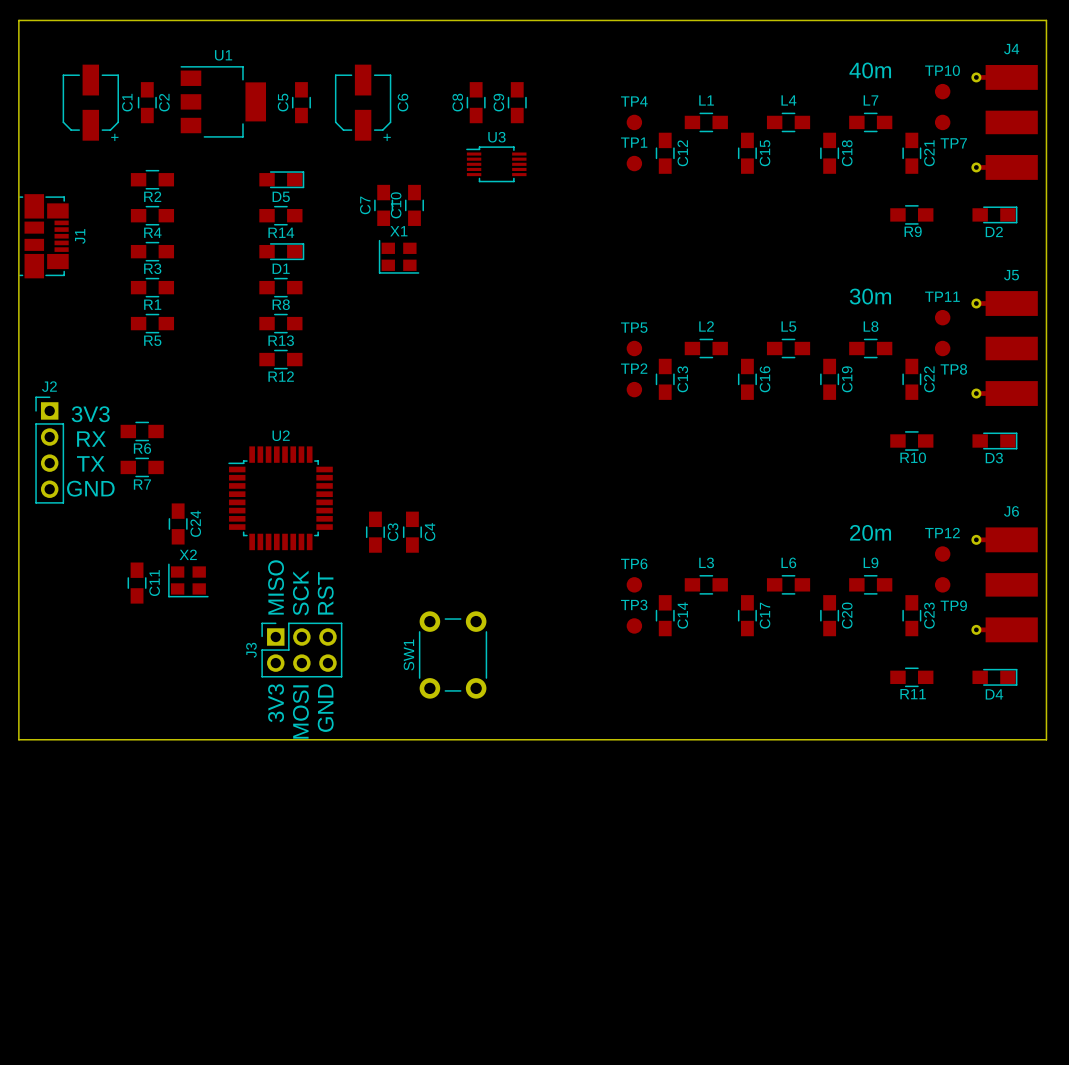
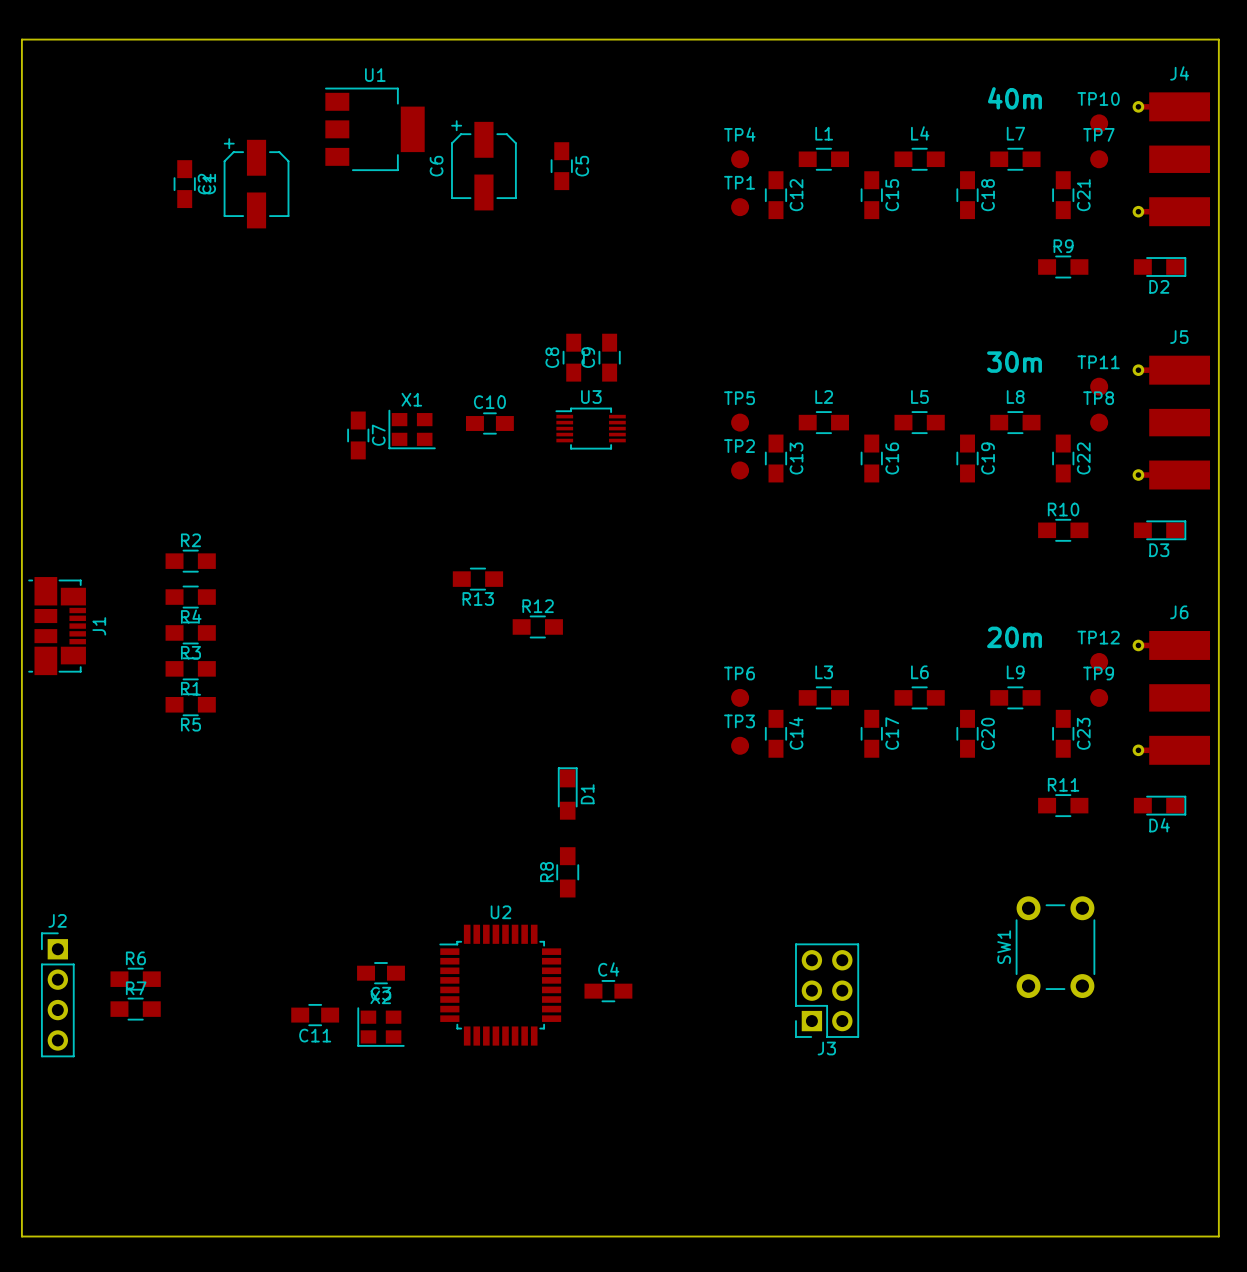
board edge: (18, 20) (18, 739) (1046, 739) (1046, 20) (18, 20) -> (21, 39) (21, 1236) (1218, 1236) (1218, 39) (21, 39)
U1 position: (223, 101) -> (374, 129)
C1 rotation: 0° (90, 102) -> 180° (256, 184)
C1 position: (90, 102) -> (256, 184)
C2 position: (147, 102) -> (184, 184)
C5 name position: C5 (283, 102) -> C5 (582, 166)
C5 position: (301, 102) -> (561, 166)
C6 rotation: 0° (363, 102) -> 180° (483, 166)
C6 position: (363, 102) -> (483, 166)
C8 position: (476, 102) -> (573, 357)
C9 position: (517, 102) -> (609, 357)
TP7 name position: TP7 (953, 143) -> TP7 (1098, 134)
U3 position: (496, 164) -> (590, 428)
R2 position: (152, 179) -> (190, 561)
D5: (281, 179) -> none
R2 name position: R2 (152, 196) -> R2 (190, 540)
C7 name position: C7 (365, 205) -> C7 (378, 435)
C7 position: (383, 205) -> (358, 435)
C10 rotation: 0° (414, 205) -> 90° clockwise (489, 423)
C10 position: (414, 205) -> (489, 423)
R4 position: (152, 215) -> (190, 597)
R14: (280, 215) -> none
R9 name position: R9 (913, 231) -> R9 (1063, 246)
J1 position: (43, 236) -> (57, 626)
R3 position: (152, 251) -> (190, 632)
D1 rotation: 0° (281, 251) -> 90° counterclockwise (567, 793)
D1 position: (281, 251) -> (567, 793)
X1 position: (399, 256) -> (412, 429)
R1 position: (152, 287) -> (190, 668)
R8 rotation: 0° (280, 287) -> 90° clockwise (567, 872)
R8 position: (280, 287) -> (567, 872)
R5 position: (152, 323) -> (190, 704)
R13 position: (280, 323) -> (477, 579)
R12 position: (280, 359) -> (537, 626)
TP8 name position: TP8 (953, 369) -> TP8 (1098, 398)
R12 name position: R12 (281, 376) -> R12 (538, 606)
text: 3V3 (90, 414) -> none
R6 position: (142, 431) -> (135, 979)
text: RX (91, 439) -> none
R6 name position: R6 (142, 448) -> R6 (135, 958)
J2 position: (49, 450) -> (57, 994)
R10 name position: R10 (913, 457) -> R10 (1063, 509)
text: TX (90, 463) -> none
R7 position: (142, 467) -> (135, 1009)
R7 name position: R7 (142, 484) -> R7 (136, 988)
text: GND (90, 488) -> none
U2 position: (280, 498) -> (500, 985)
C24: (178, 523) -> none
C3 rotation: 0° (375, 532) -> 90° clockwise (381, 973)
C3 position: (375, 532) -> (381, 973)
C4 rotation: 0° (412, 532) -> 90° clockwise (608, 991)
C4 position: (412, 532) -> (608, 991)
C4 name position: C4 (430, 532) -> C4 (608, 969)
X2 position: (188, 580) -> (381, 1027)
C11 rotation: 0° (137, 583) -> 90° clockwise (315, 1015)
C11 position: (137, 583) -> (315, 1015)
text: MISO (276, 587) -> none
text: SCK (300, 593) -> none
text: RST (325, 593) -> none
TP9 name position: TP9 (953, 605) -> TP9 (1098, 673)
J3 rotation: 0° (301, 650) -> 90° counterclockwise (827, 990)
J3 position: (301, 650) -> (827, 990)
SW1 position: (453, 654) -> (1055, 947)
R11 name position: R11 (913, 694) -> R11 (1063, 784)
text: 3V3 (276, 703) -> none
text: GND (325, 708) -> none
text: MOSI (300, 711) -> none

